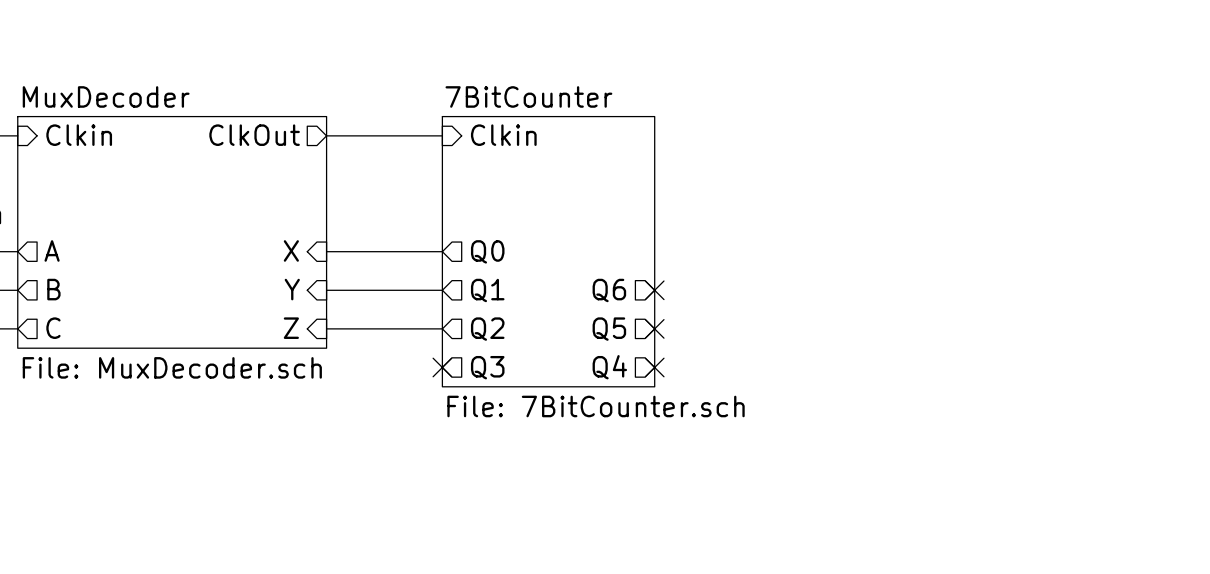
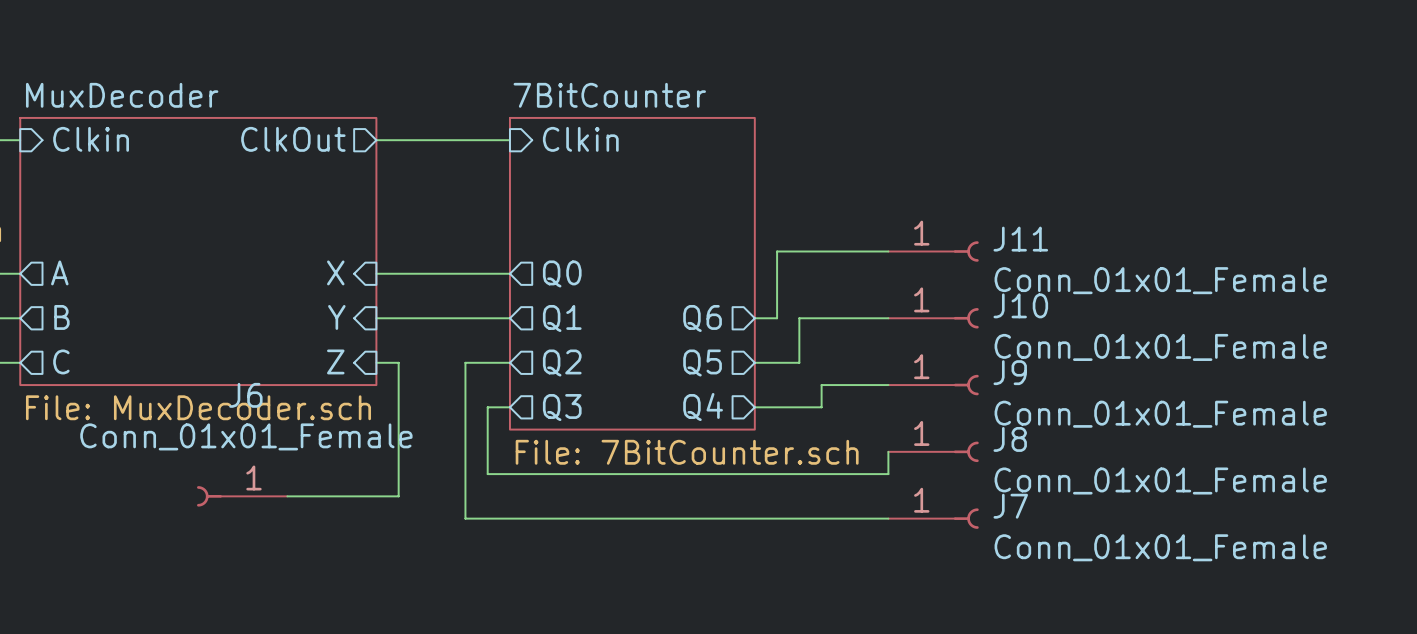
wire: none -> (888, 251) (777, 251) (777, 318) (754, 318)
J11: none -> Conn_01x01_Female (933, 251)
no-connect mark: (654, 290) -> none
wire: none -> (888, 318) (799, 318) (799, 362) (754, 362)
J10: none -> Conn_01x01_Female (933, 318)
wire: (345, 328) (403, 328) -> (398, 362) (398, 496) (287, 496)
wire: none -> (465, 362) (465, 518) (888, 518)
no-connect mark: (654, 328) -> none
wire: none -> (888, 385) (821, 385) (821, 407) (754, 407)
J9: none -> Conn_01x01_Female (933, 385)
wire: none -> (509, 407) (487, 407) (487, 474) (888, 474) (888, 451)
no-connect mark: (442, 367) -> none
no-connect mark: (654, 367) -> none
J8: none -> Conn_01x01_Female (933, 451)
J6: none -> Conn_01x01_Female (242, 496)
J7: none -> Conn_01x01_Female (933, 518)

